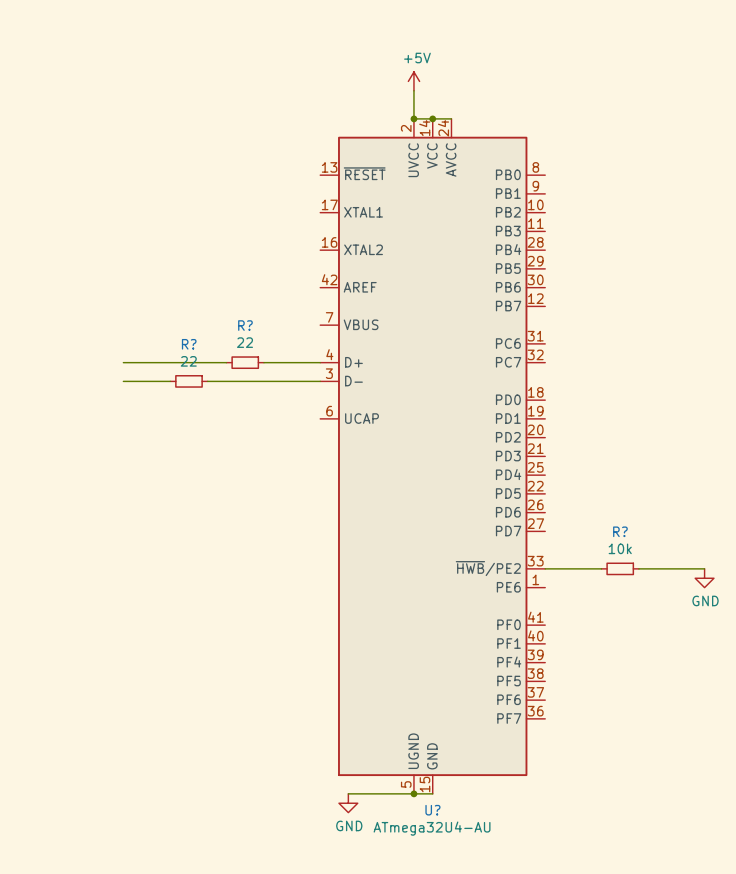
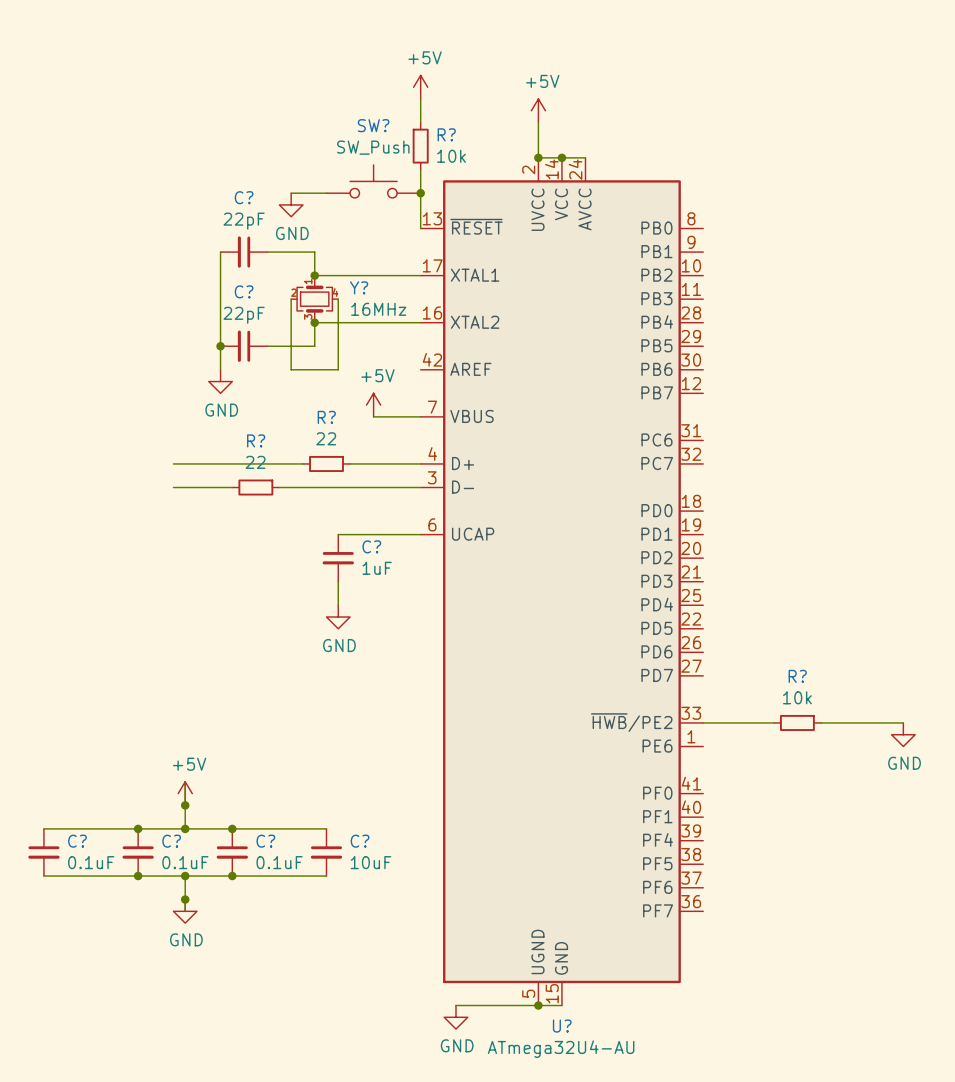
power symbol: none -> +5V (420, 87)
wire: none -> (420, 99) (420, 122)
R?: none -> 10k (420, 146)
wire: none -> (420, 169) (420, 228)
SW?: none -> SW_Push (373, 181)
wire: none -> (291, 193) (326, 193)
junction: none -> (420, 193)
power symbol: none -> GND (291, 204)
wire: none -> (220, 252) (220, 369)
C?: none -> 22pF (244, 252)
wire: none -> (267, 252) (314, 252) (314, 275) (420, 275)
junction: none -> (314, 275)
wire: none -> (291, 299) (291, 369) (338, 369) (338, 299)
Y?: none -> 16MHz (314, 299)
junction: none -> (314, 322)
wire: none -> (420, 322) (314, 322) (314, 346) (267, 346)
junction: none -> (220, 346)
C?: none -> 22pF (244, 346)
power symbol: none -> GND (220, 381)
power symbol: none -> +5V (373, 405)
wire: none -> (373, 416) (420, 416)
wire: none -> (338, 534) (420, 534)
C?: none -> 1uF (338, 558)
wire: none -> (338, 581) (338, 605)
power symbol: none -> GND (338, 617)
wire: none -> (185, 781) (185, 828)
power symbol: none -> +5V (185, 793)
junction: none -> (185, 805)
wire: none -> (43, 828) (326, 828)
junction: none -> (138, 828)
junction: none -> (185, 828)
junction: none -> (232, 828)
C?: none -> 0.1uF (43, 852)
C?: none -> 0.1uF (138, 852)
C?: none -> 0.1uF (232, 852)
C?: none -> 10uF (326, 852)
wire: none -> (43, 876) (326, 876)
junction: none -> (138, 876)
wire: none -> (185, 876) (185, 911)
junction: none -> (185, 876)
junction: none -> (232, 876)
junction: none -> (185, 899)
power symbol: none -> GND (185, 911)

